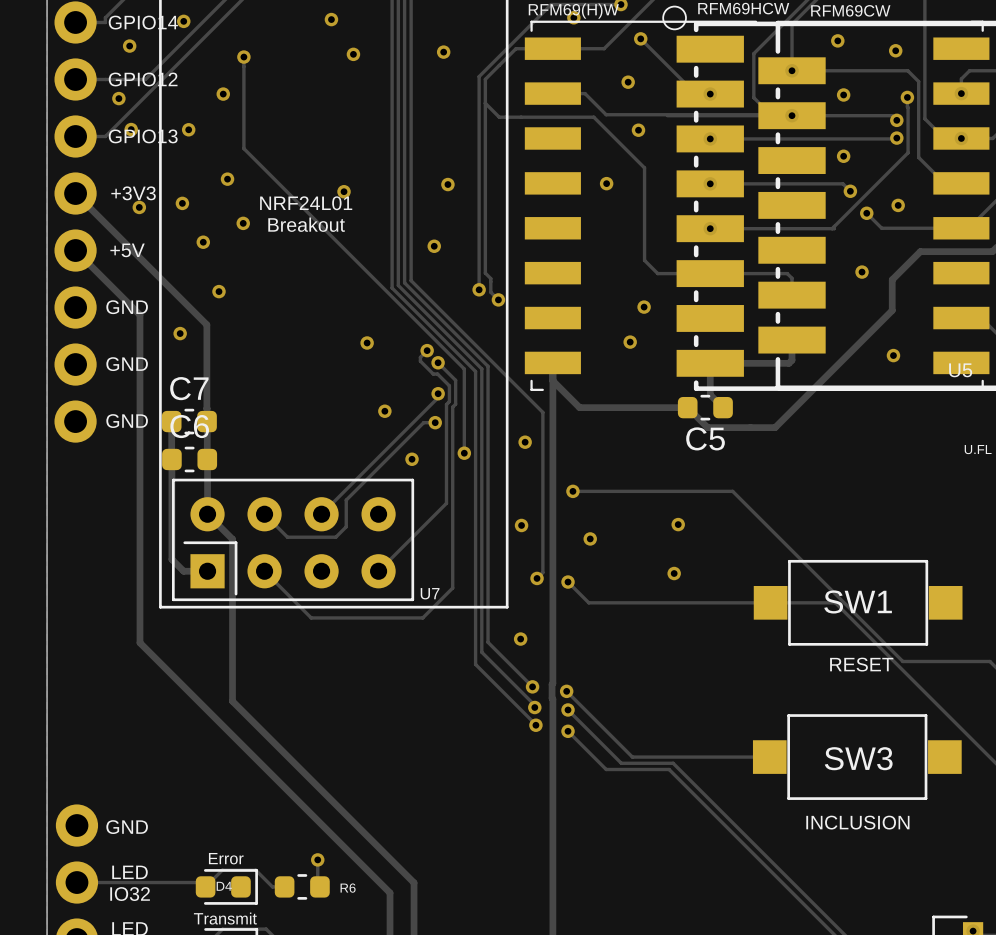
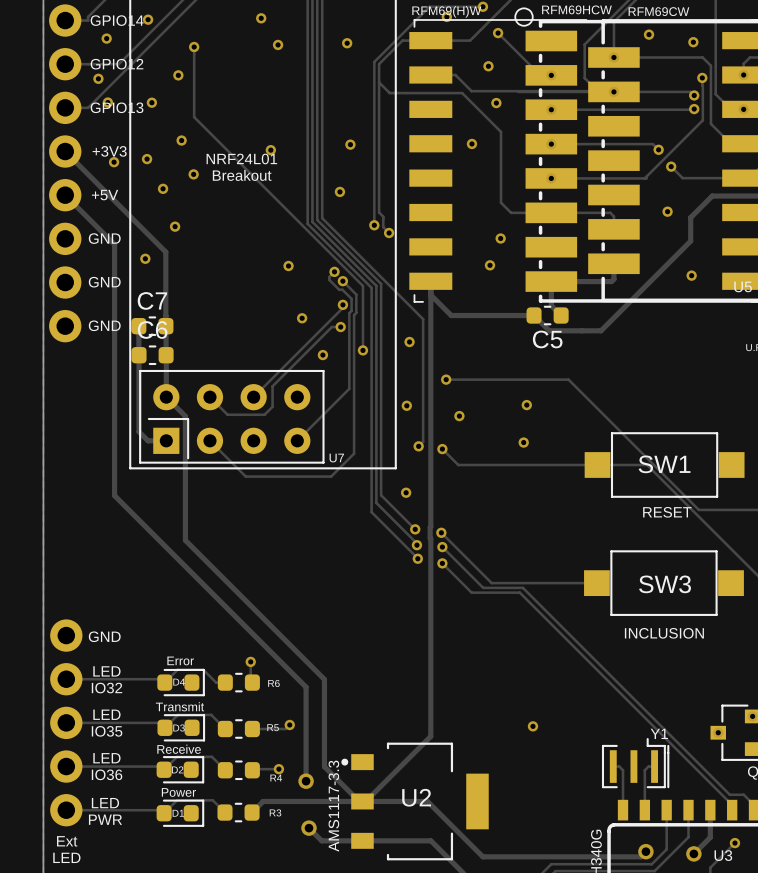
via: (843, 94) -> none
via: (843, 156) -> none
via: (898, 205) -> none

